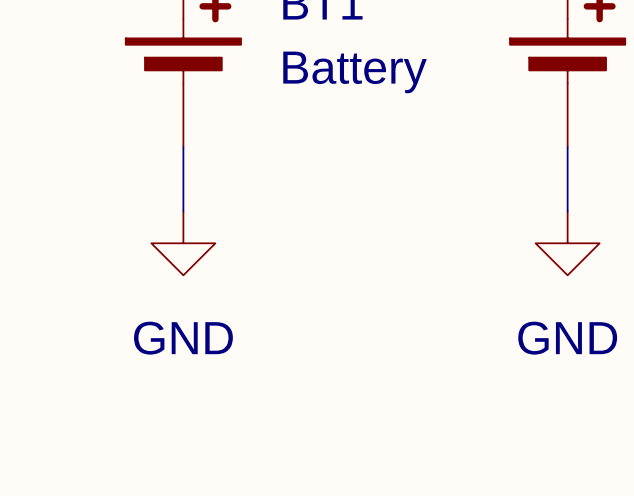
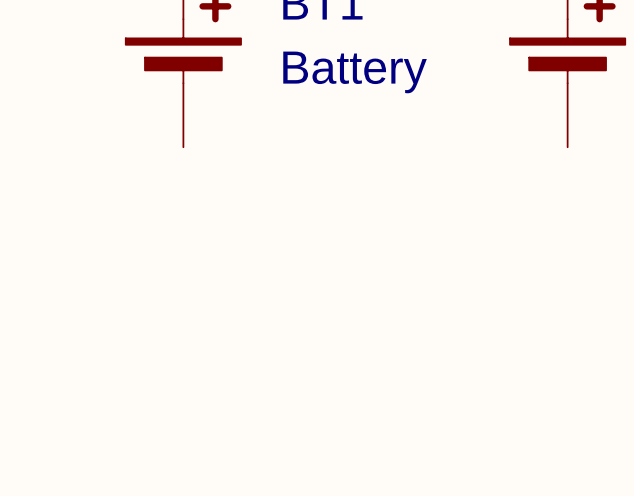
wire: (183, 147) (183, 211) -> none
wire: (567, 147) (567, 211) -> none
power symbol: GND (183, 243) -> none
power symbol: GND (567, 243) -> none

